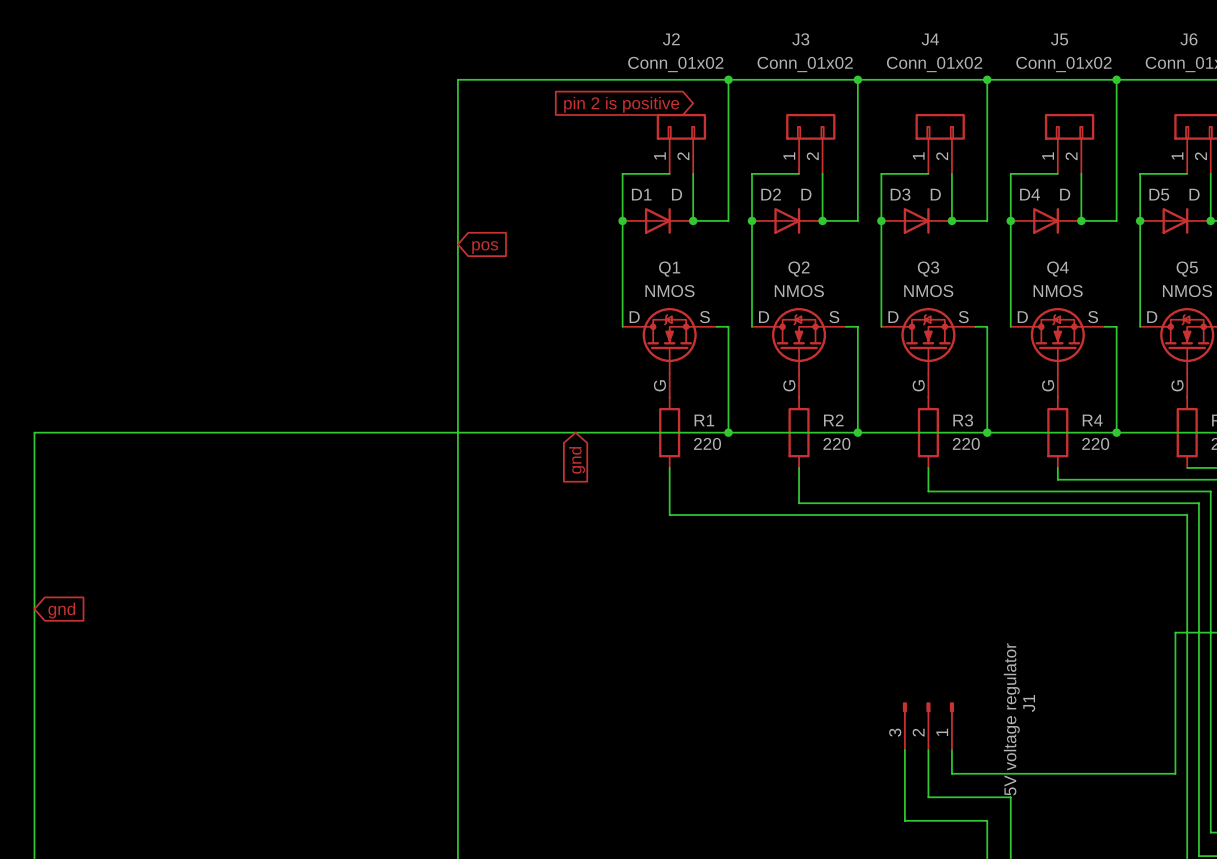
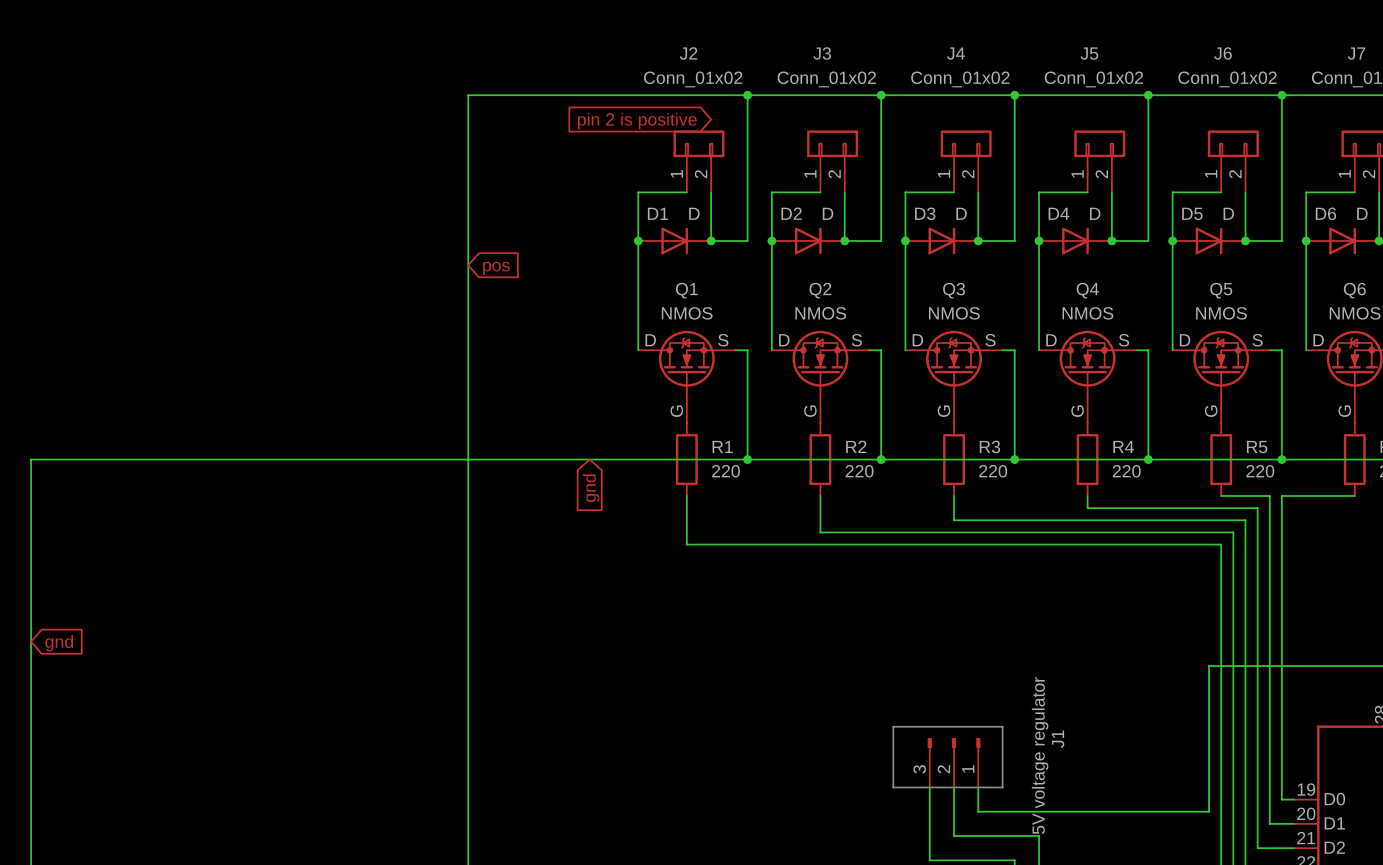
line: none -> (893, 726) (1002, 726) (1002, 787) (893, 787) (893, 726)

